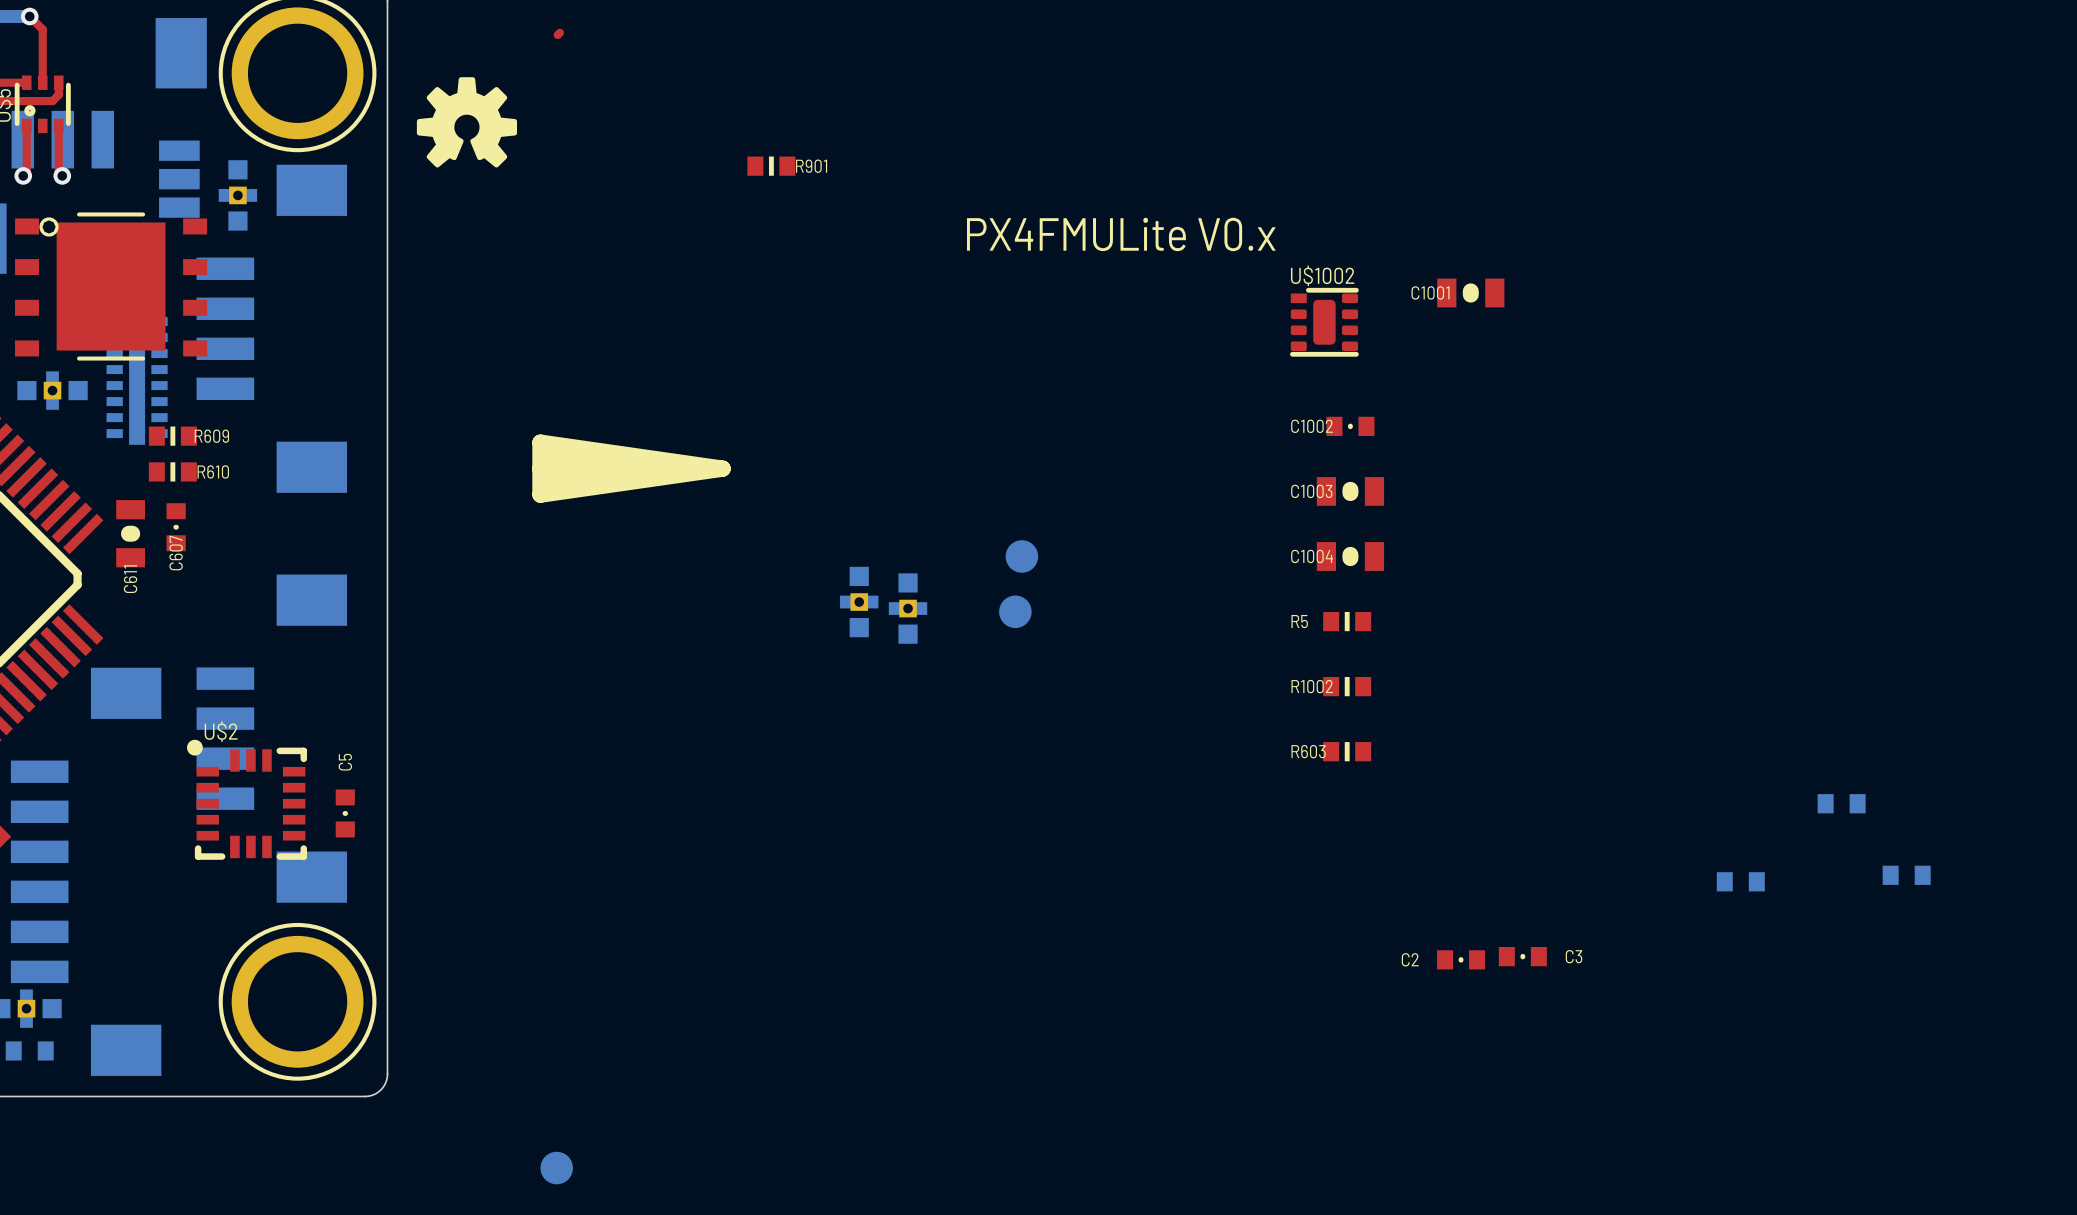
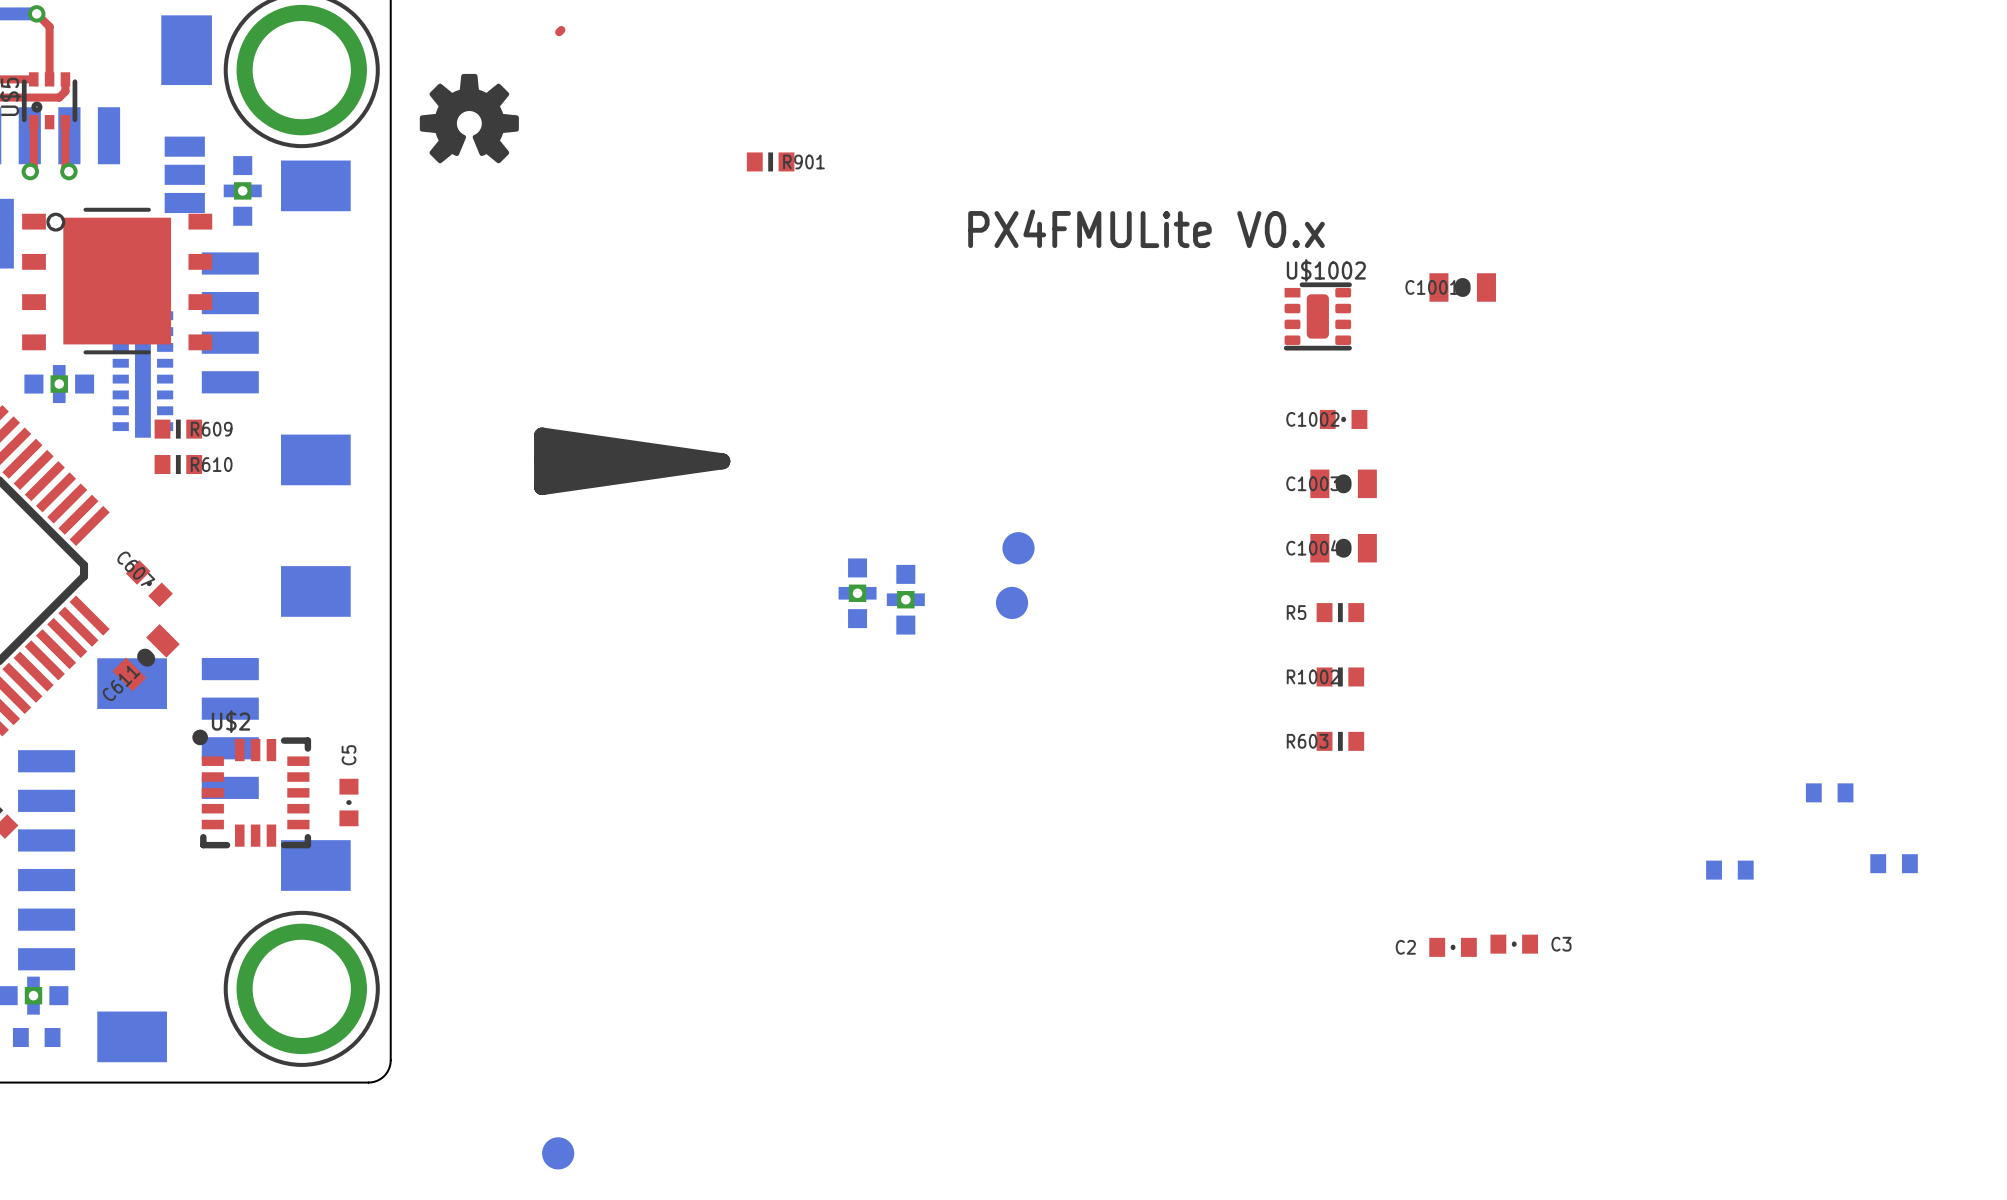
C607 rotation: 0° (176, 527) -> 45° counterclockwise (149, 583)
C607 position: (176, 527) -> (149, 583)
C611 rotation: 0° (130, 533) -> 45° clockwise (146, 657)
C611 position: (130, 533) -> (146, 657)

